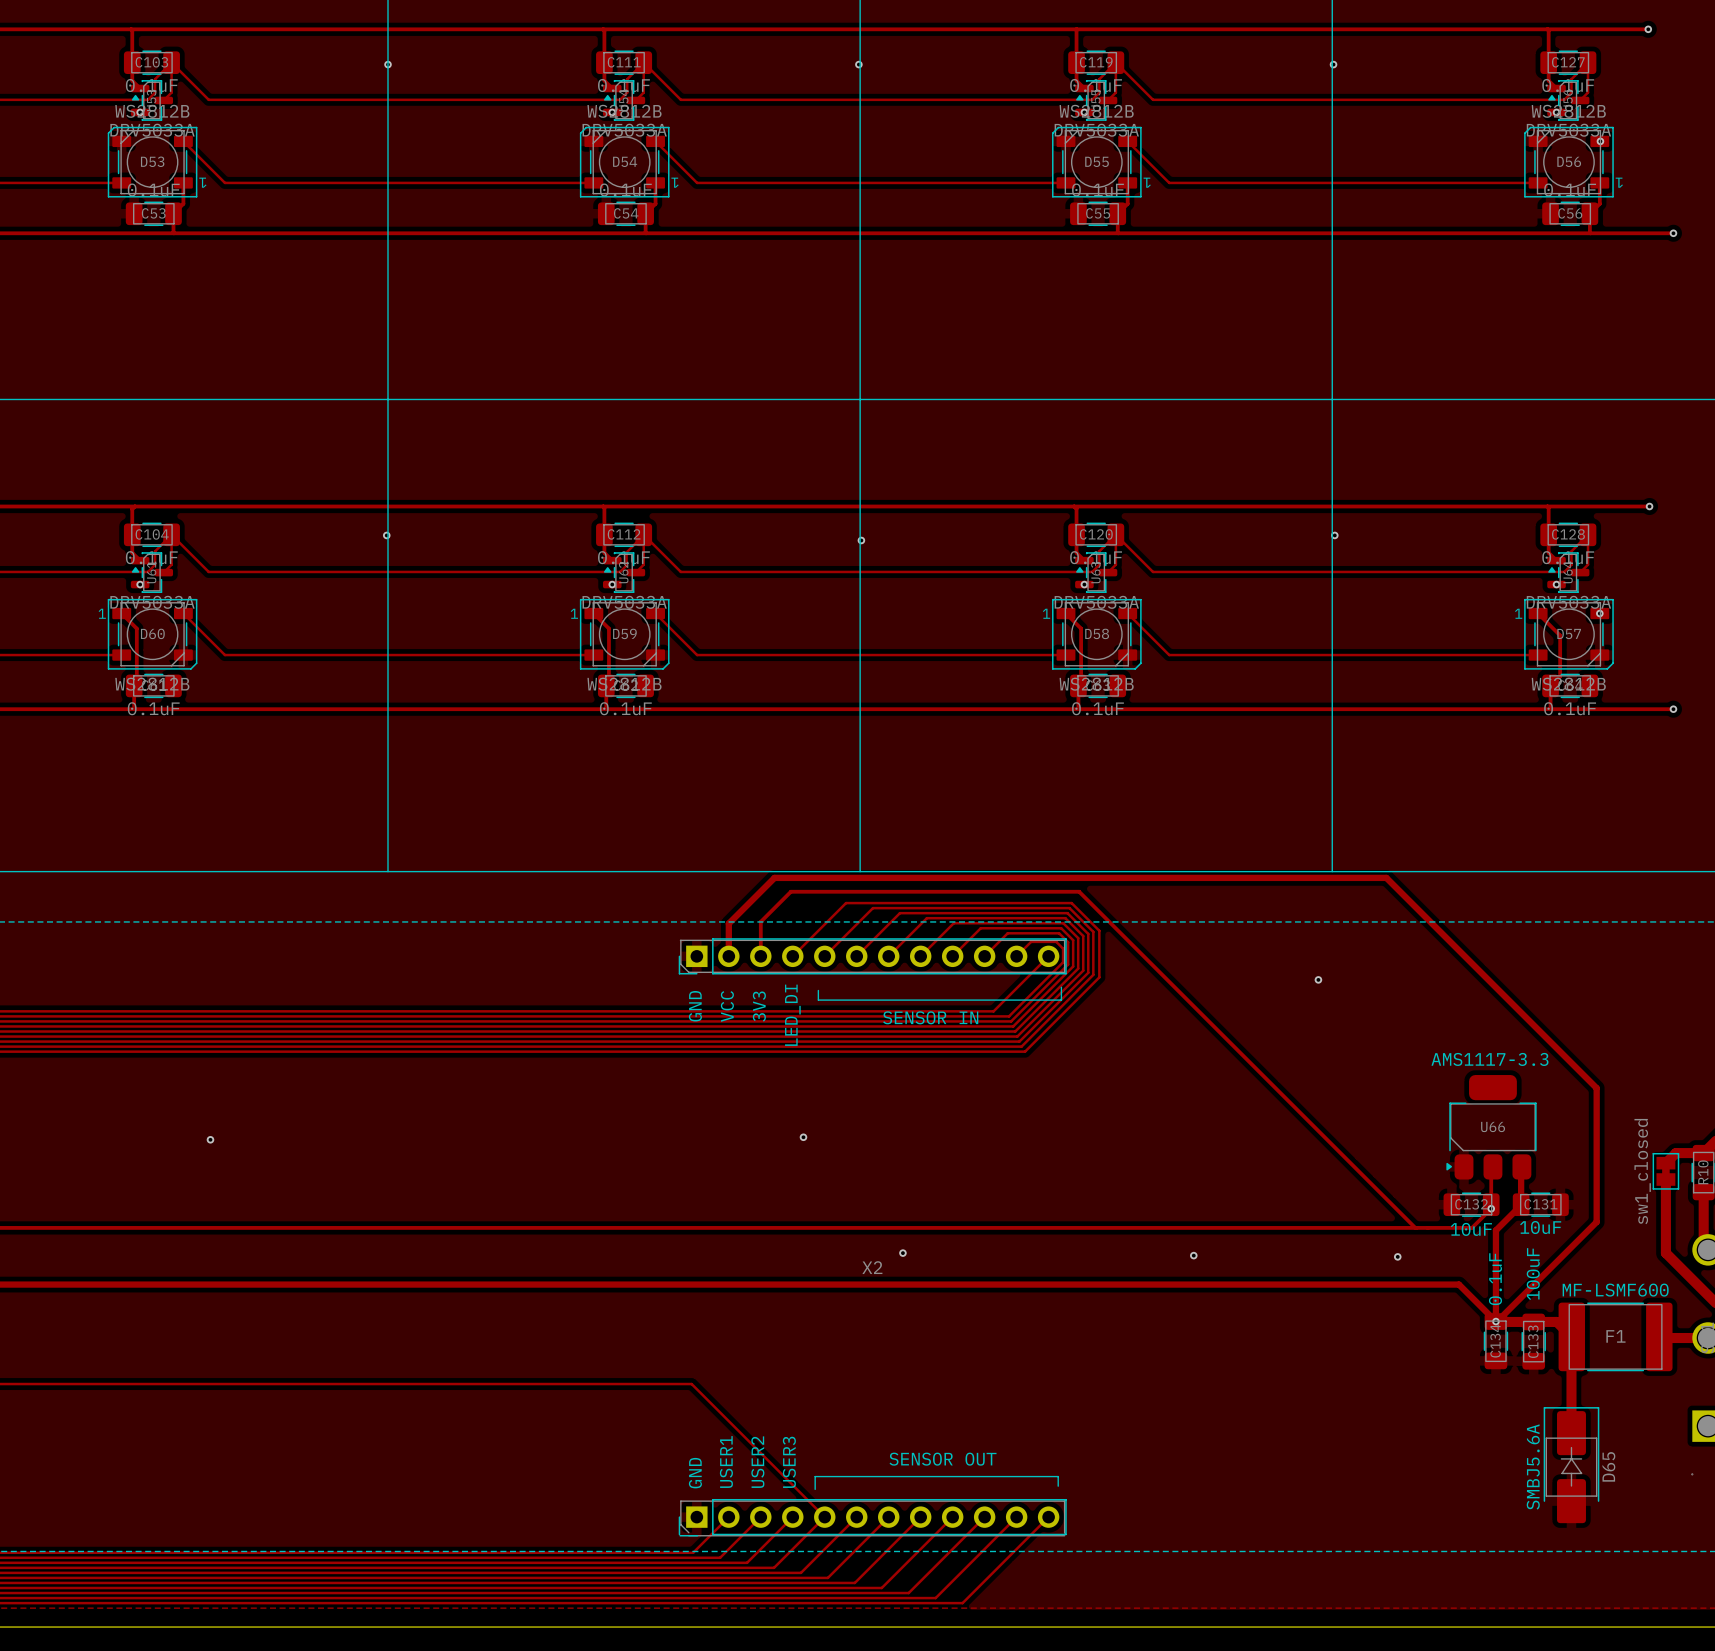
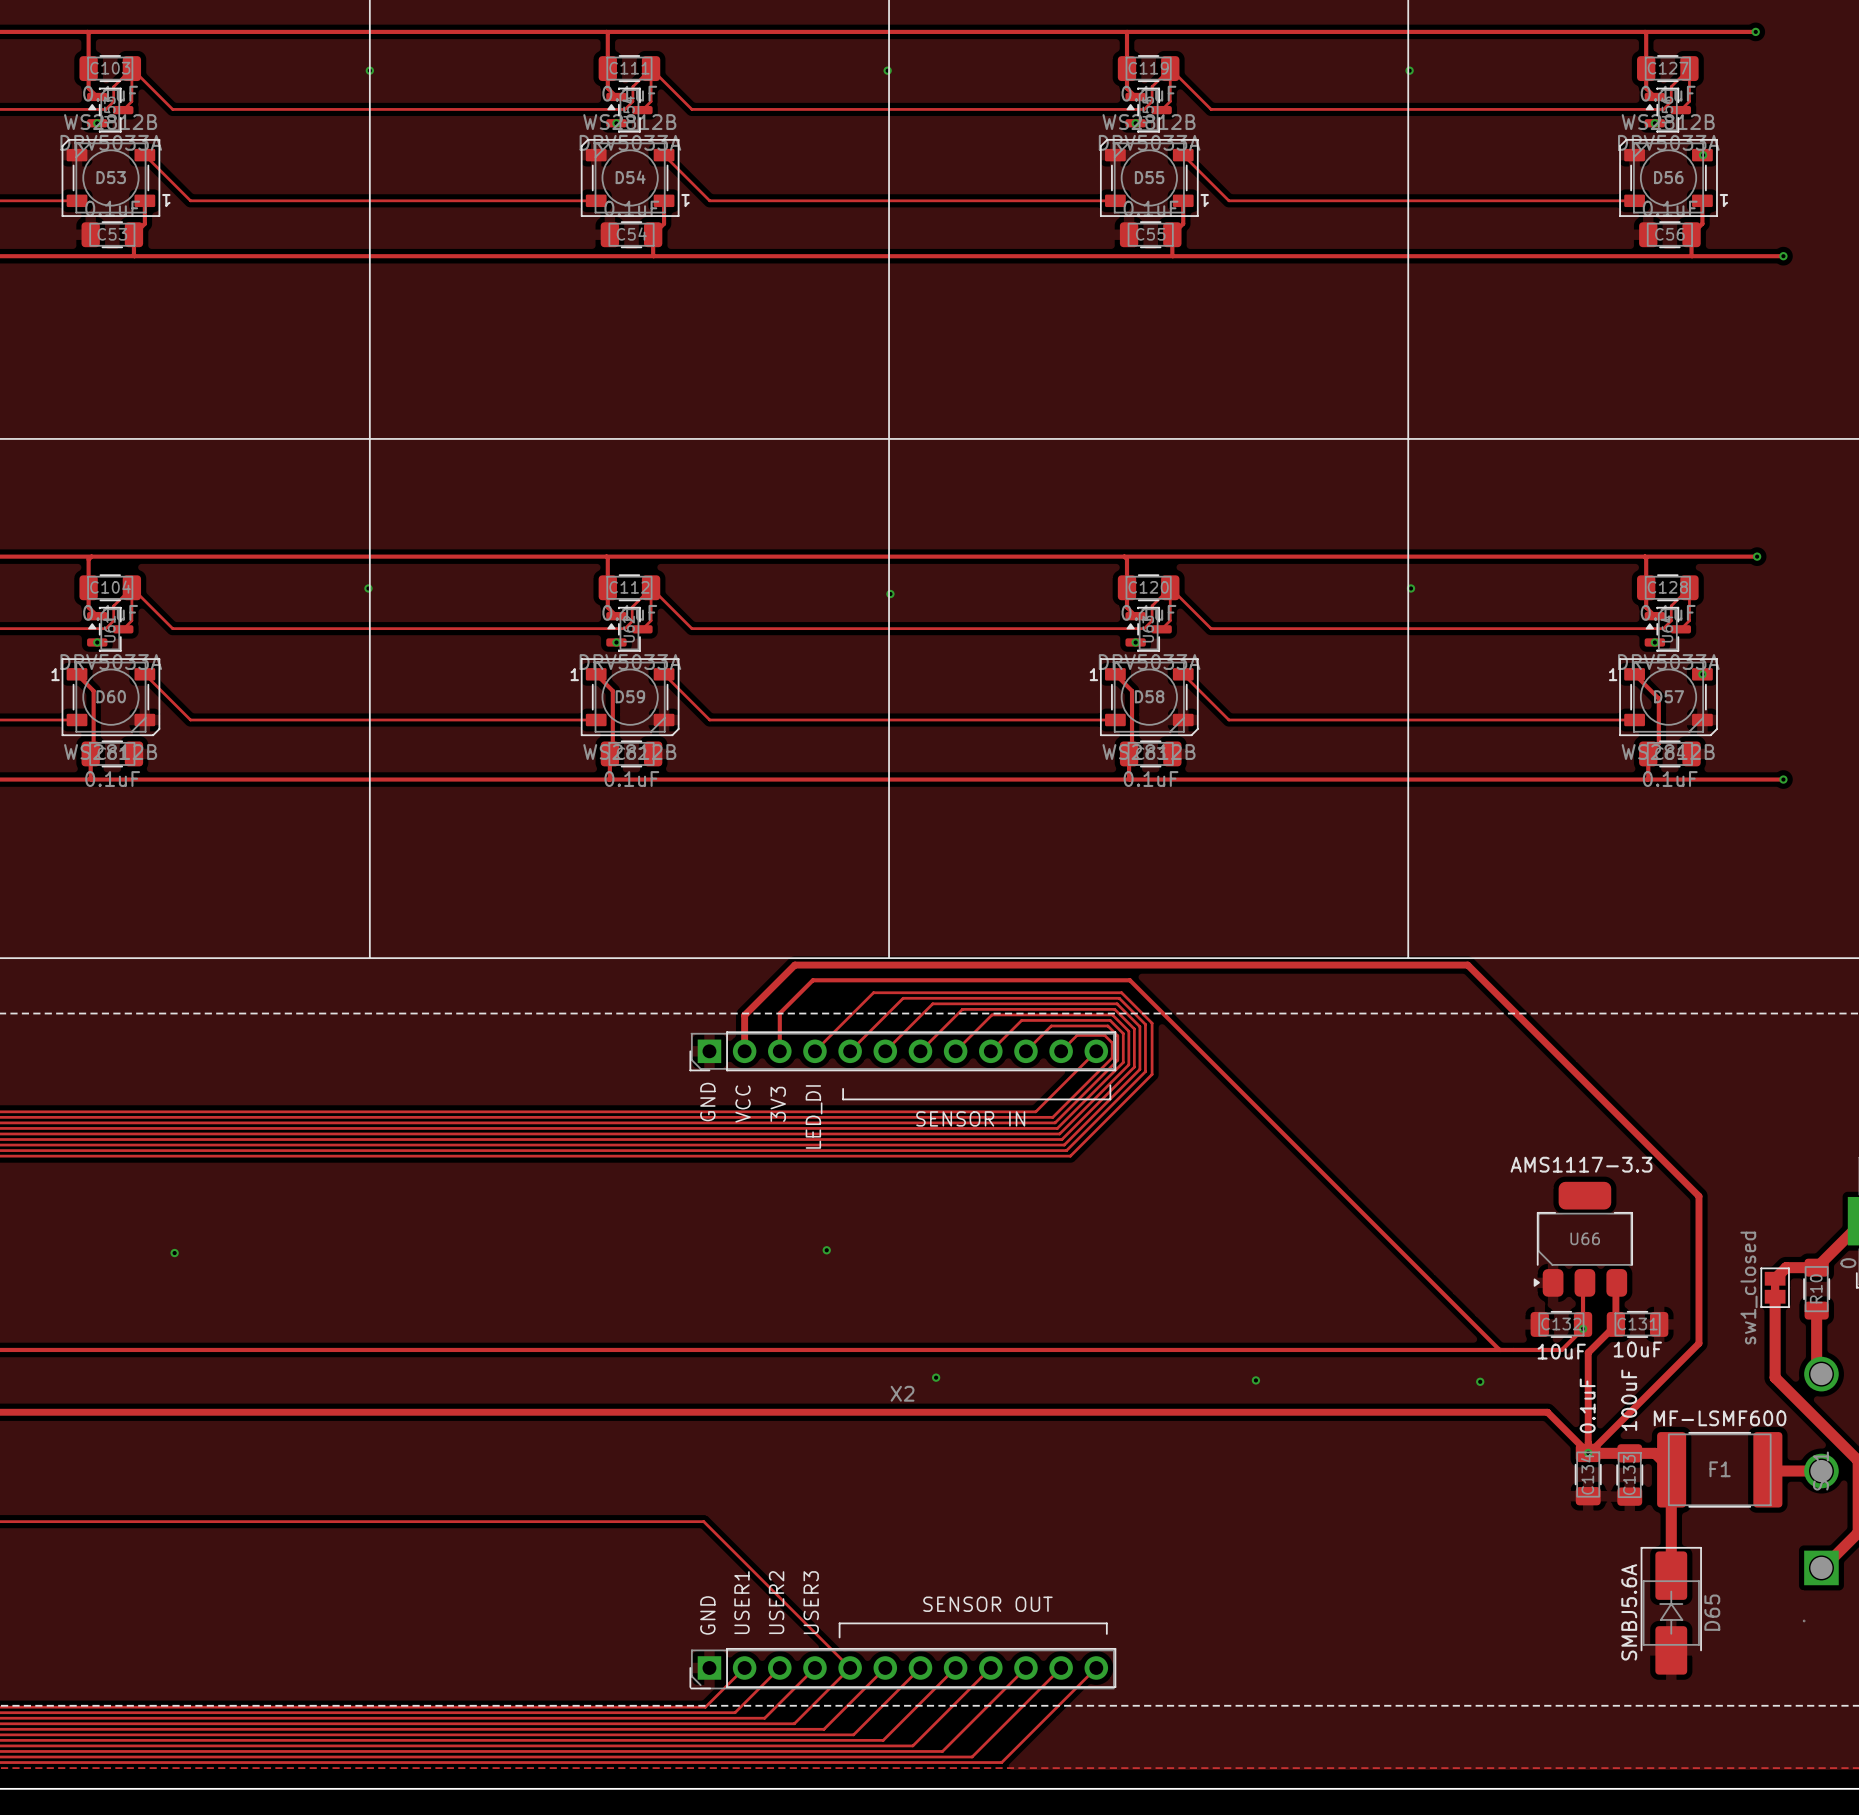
via: (1318, 979) -> none

